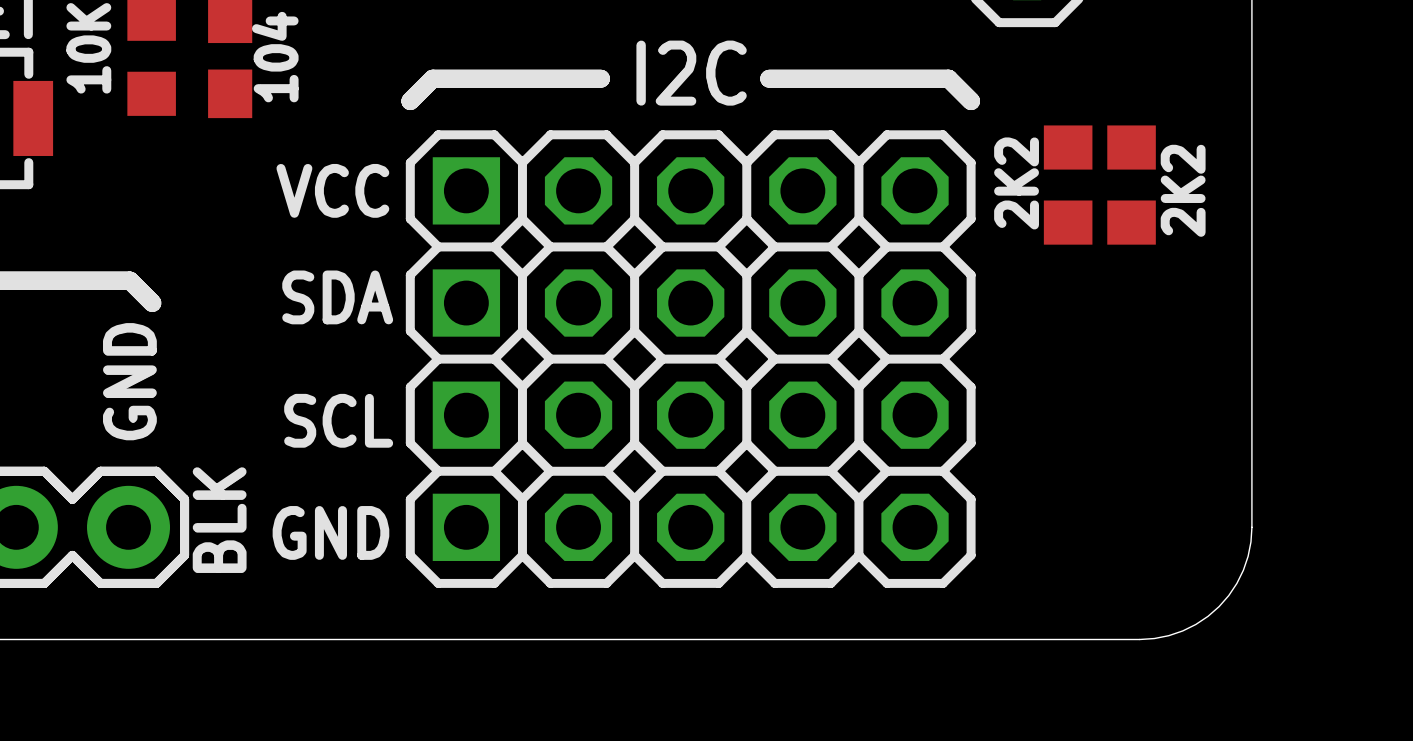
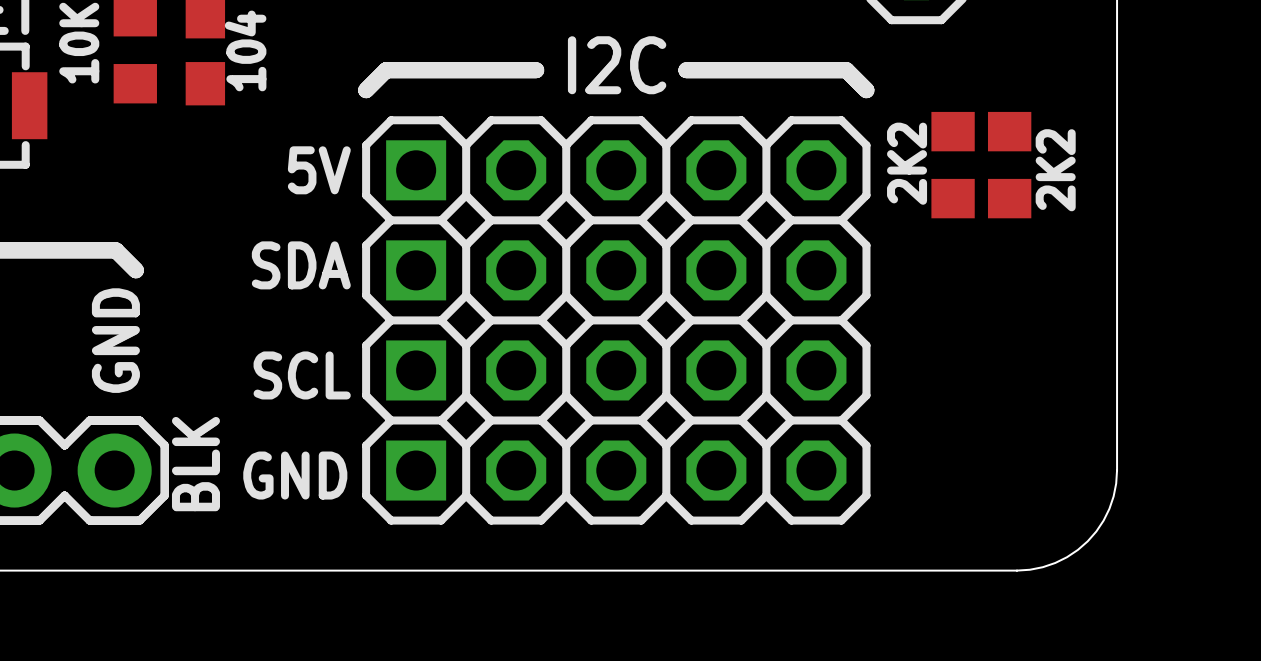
text: VCC (332, 190) -> 5V (319, 170)

